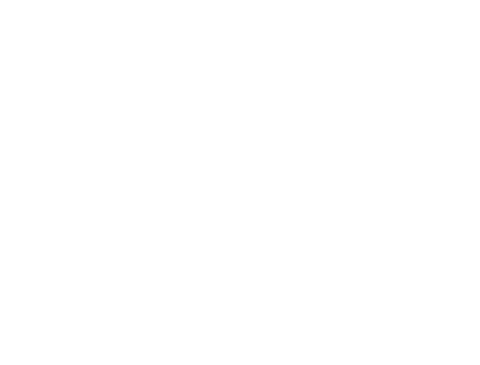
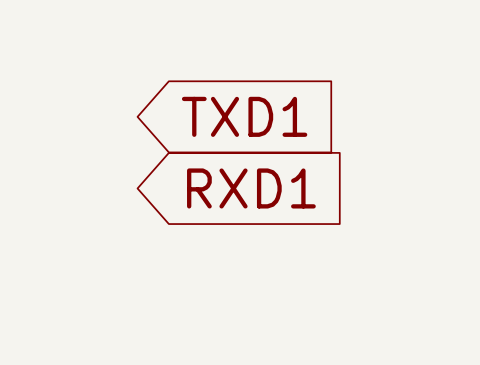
global label: none -> TXD1 (244, 116)
global label: none -> RXD1 (251, 188)

